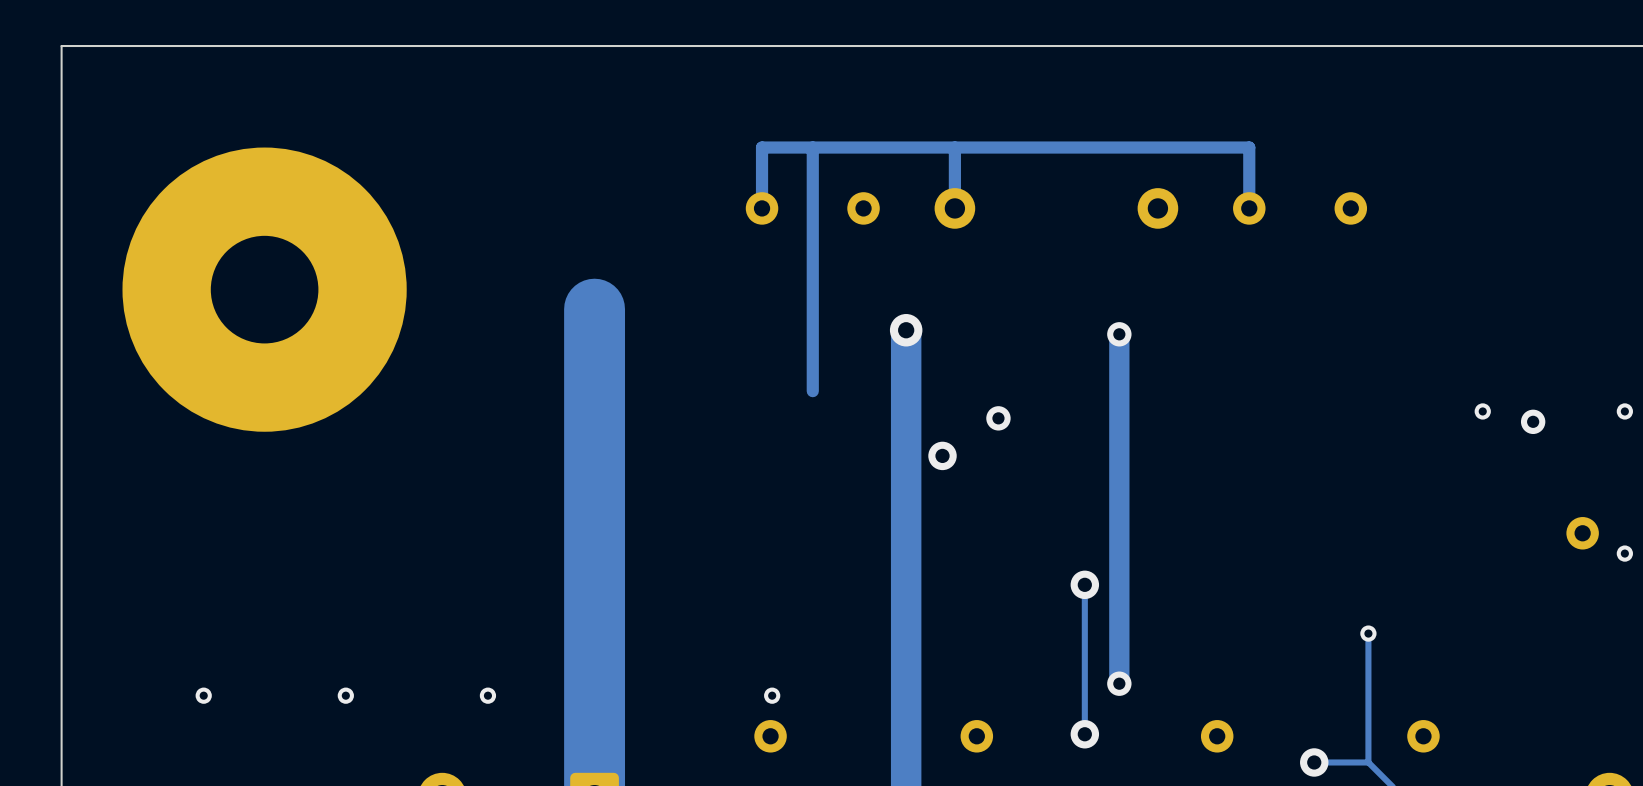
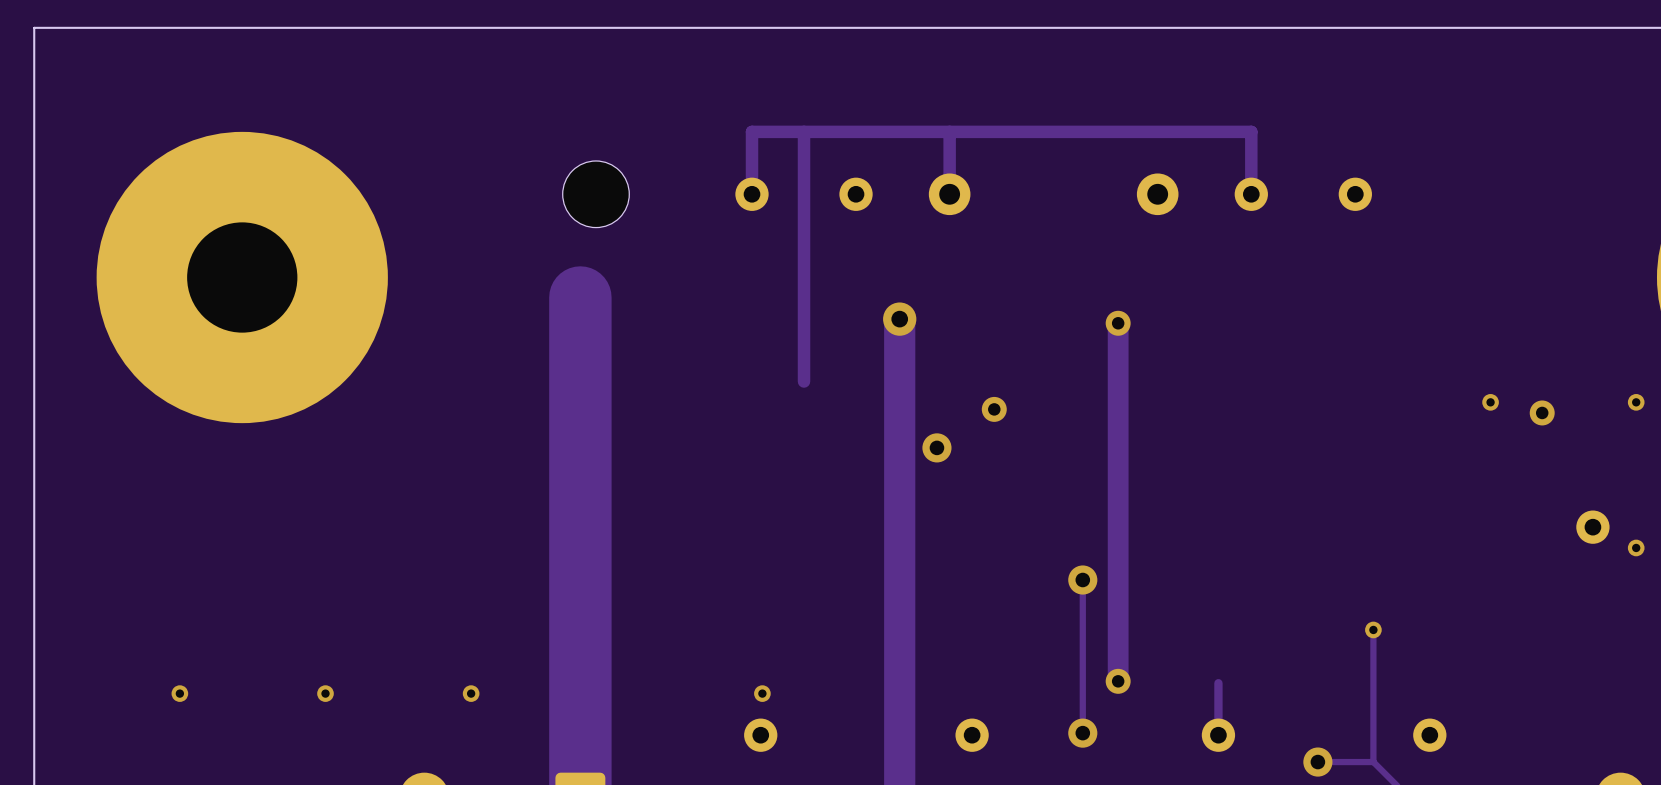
part: none -> (595, 194)
track: none -> (1218, 683) (1218, 735)

